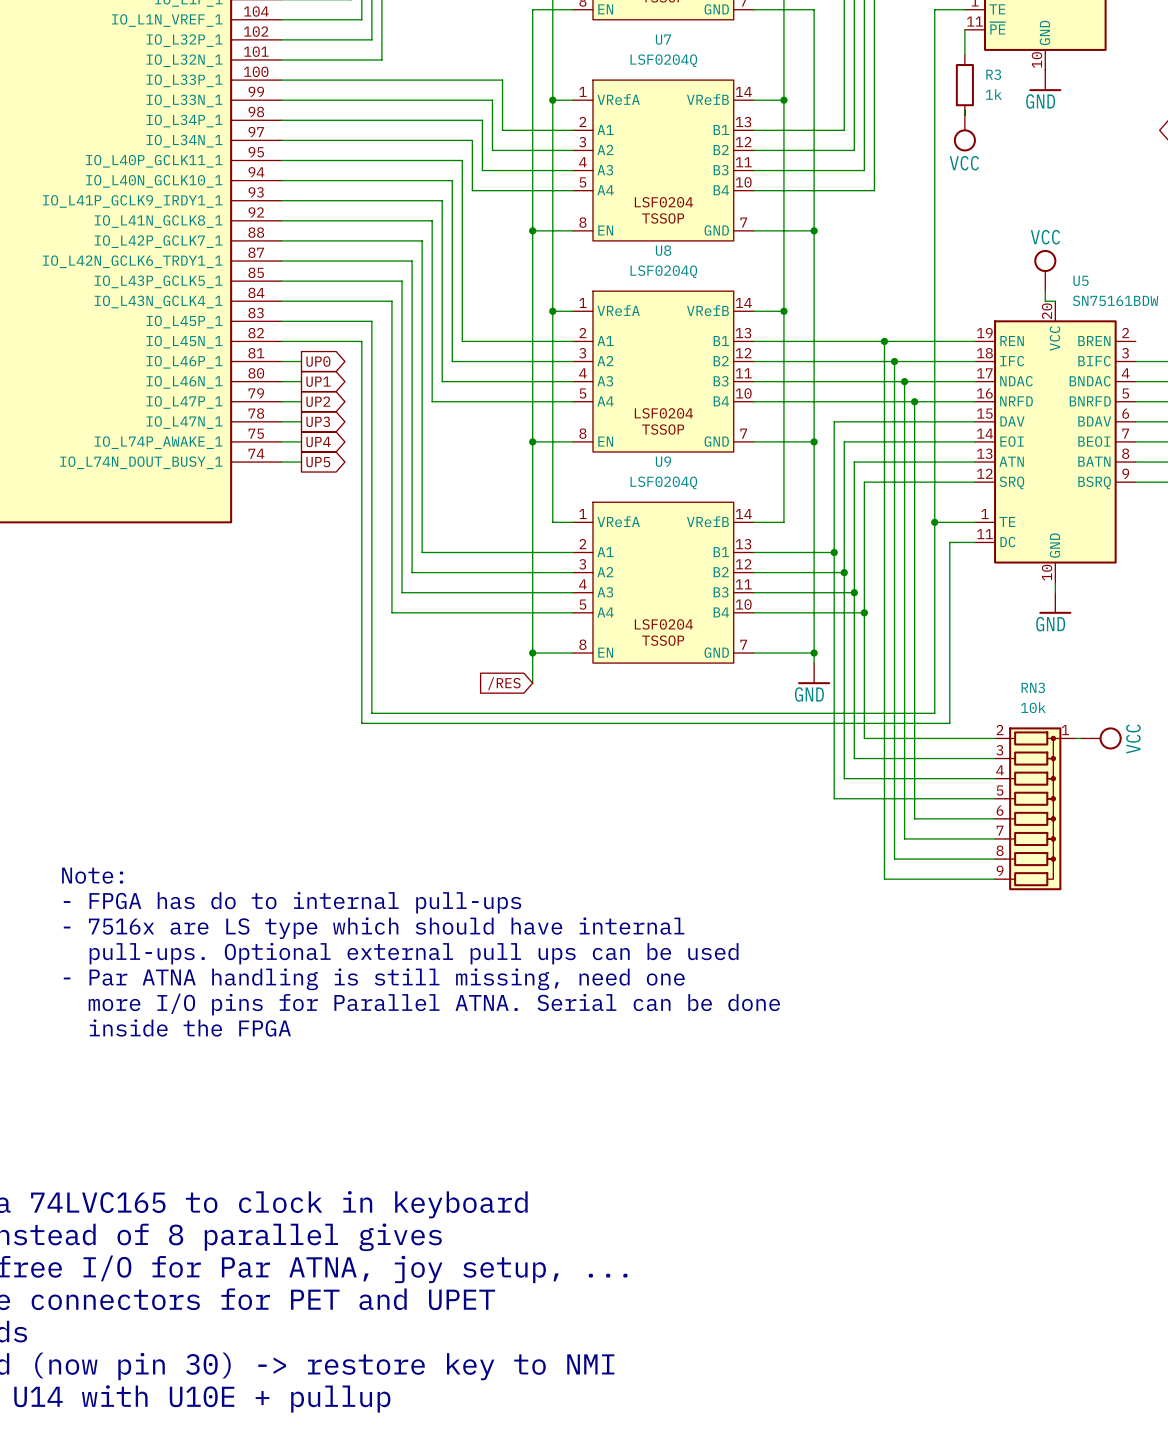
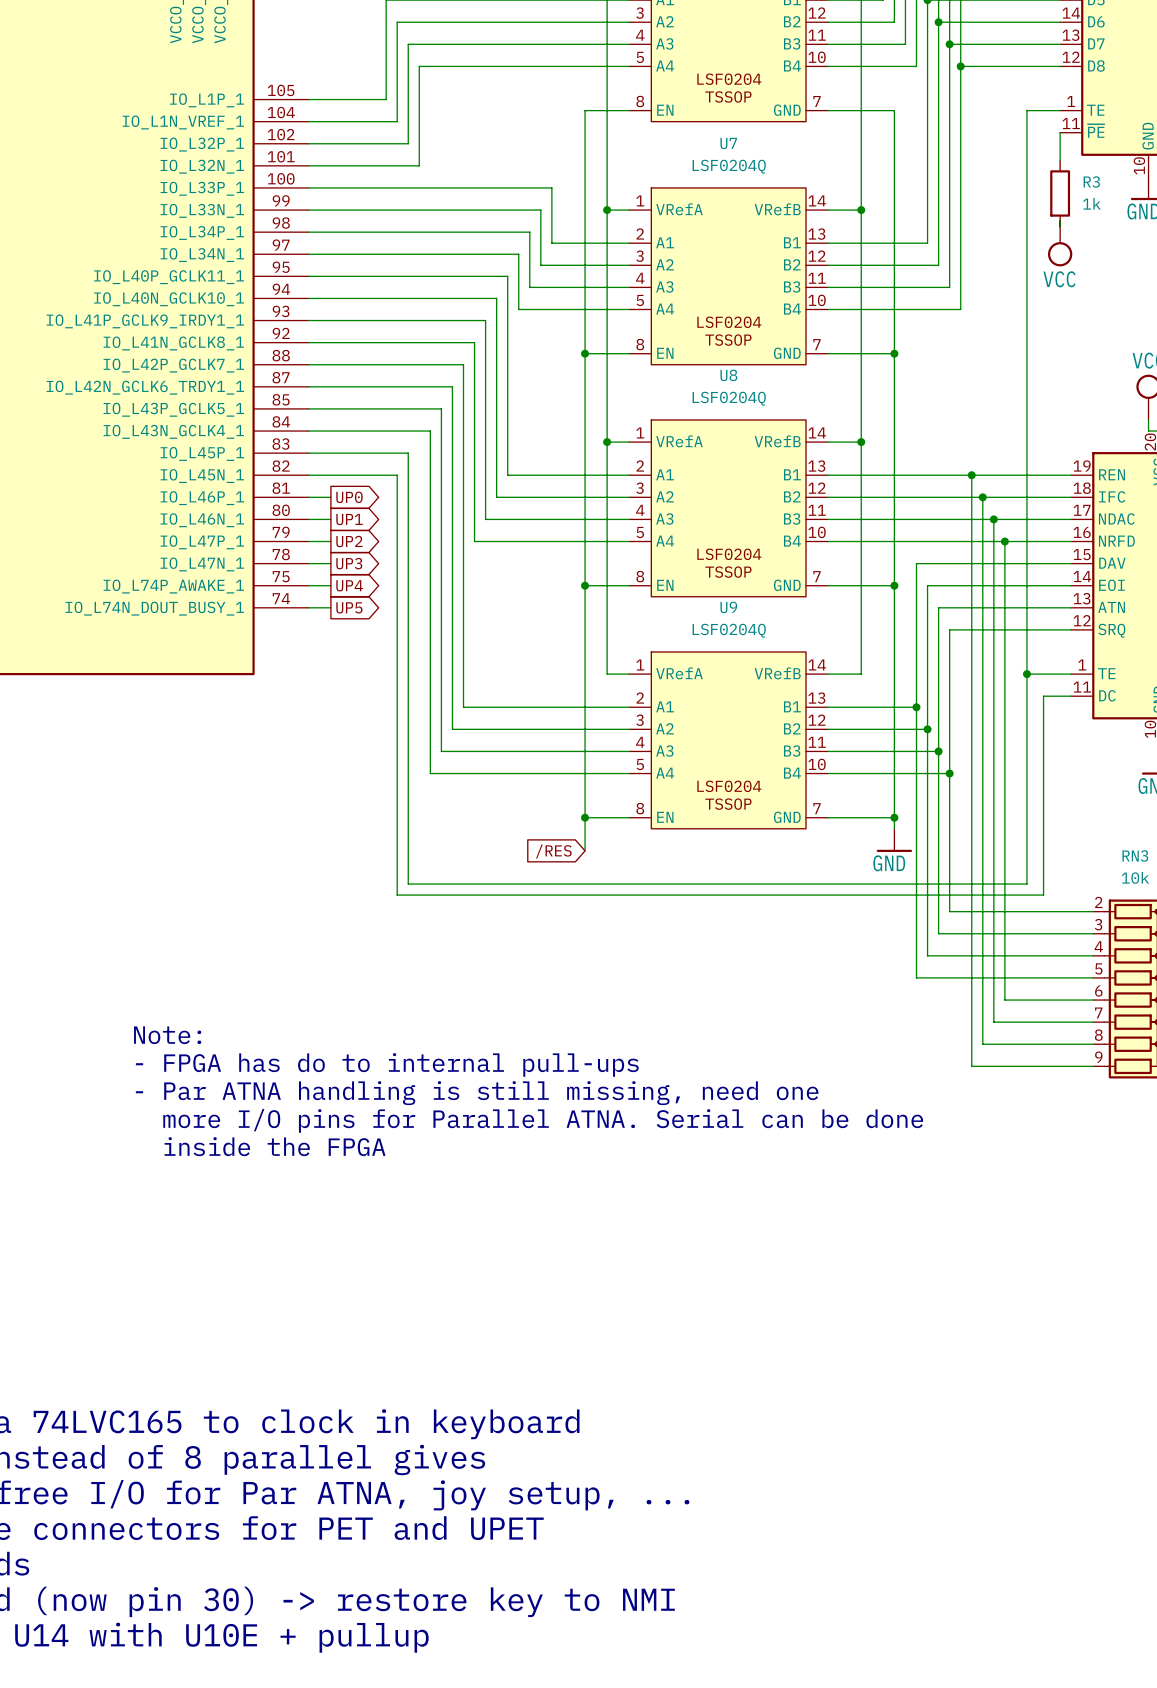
text position: Note: (92, 875) -> Note: (167, 1035)
text position: - FPGA has do to internal pull-ups (292, 902) -> - FPGA has do to internal pull-ups (387, 1064)
text: - 7516x are LS type which should have internal (374, 928) -> none
text: pull-ups. Optional external pull ups can be used (414, 953) -> none
text position: - Par ATNA handling is still missing, need one (374, 979) -> - Par ATNA handling is still missing, need one (477, 1093)
text position: more I/O pins for Parallel ATNA. Serial can be done (434, 1004) -> more I/O pins for Parallel ATNA. Serial can be done (543, 1120)
text position: inside the FPGA (190, 1028) -> inside the FPGA (275, 1146)

